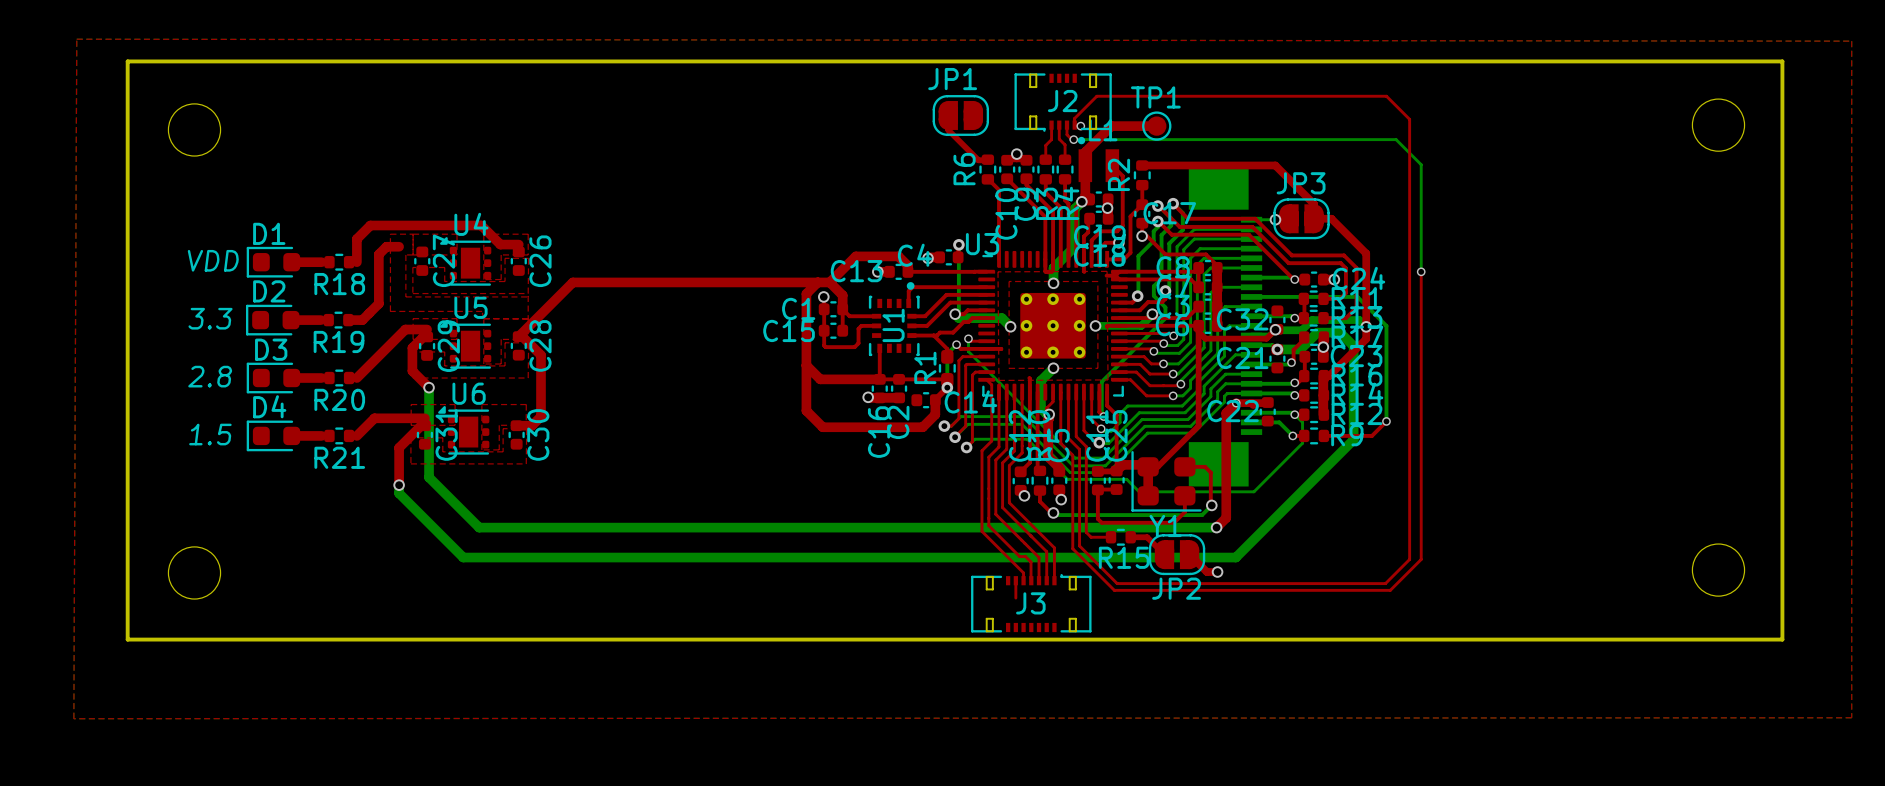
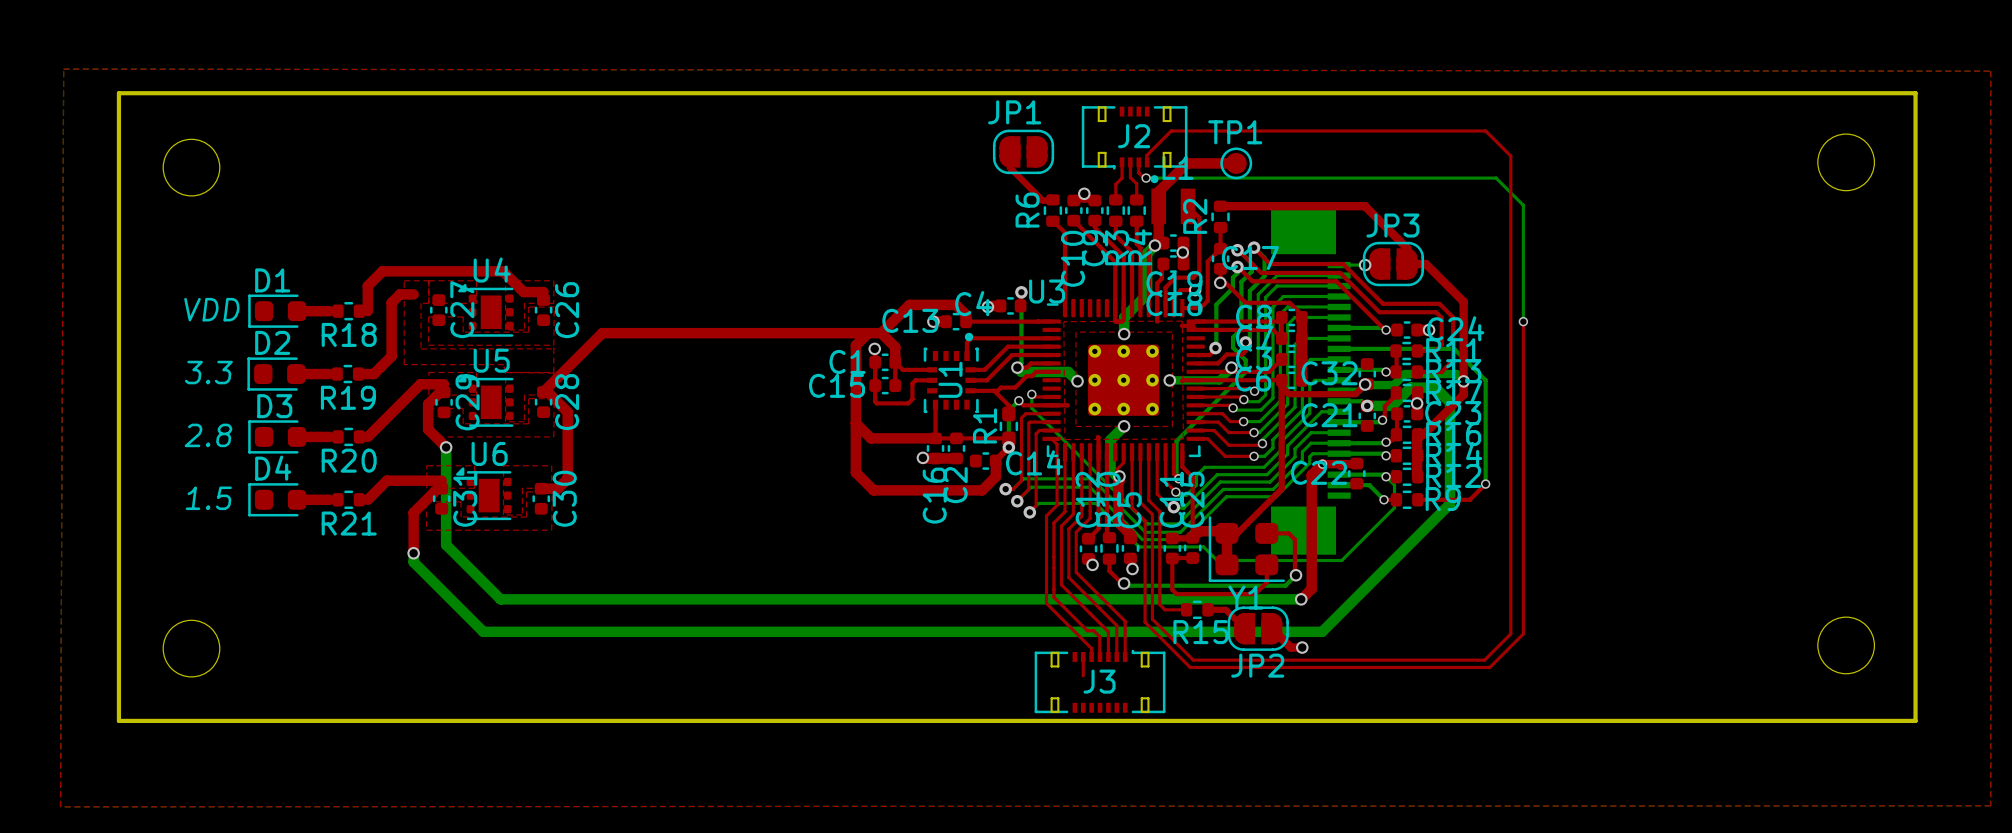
via: (1080, 126) -> none

